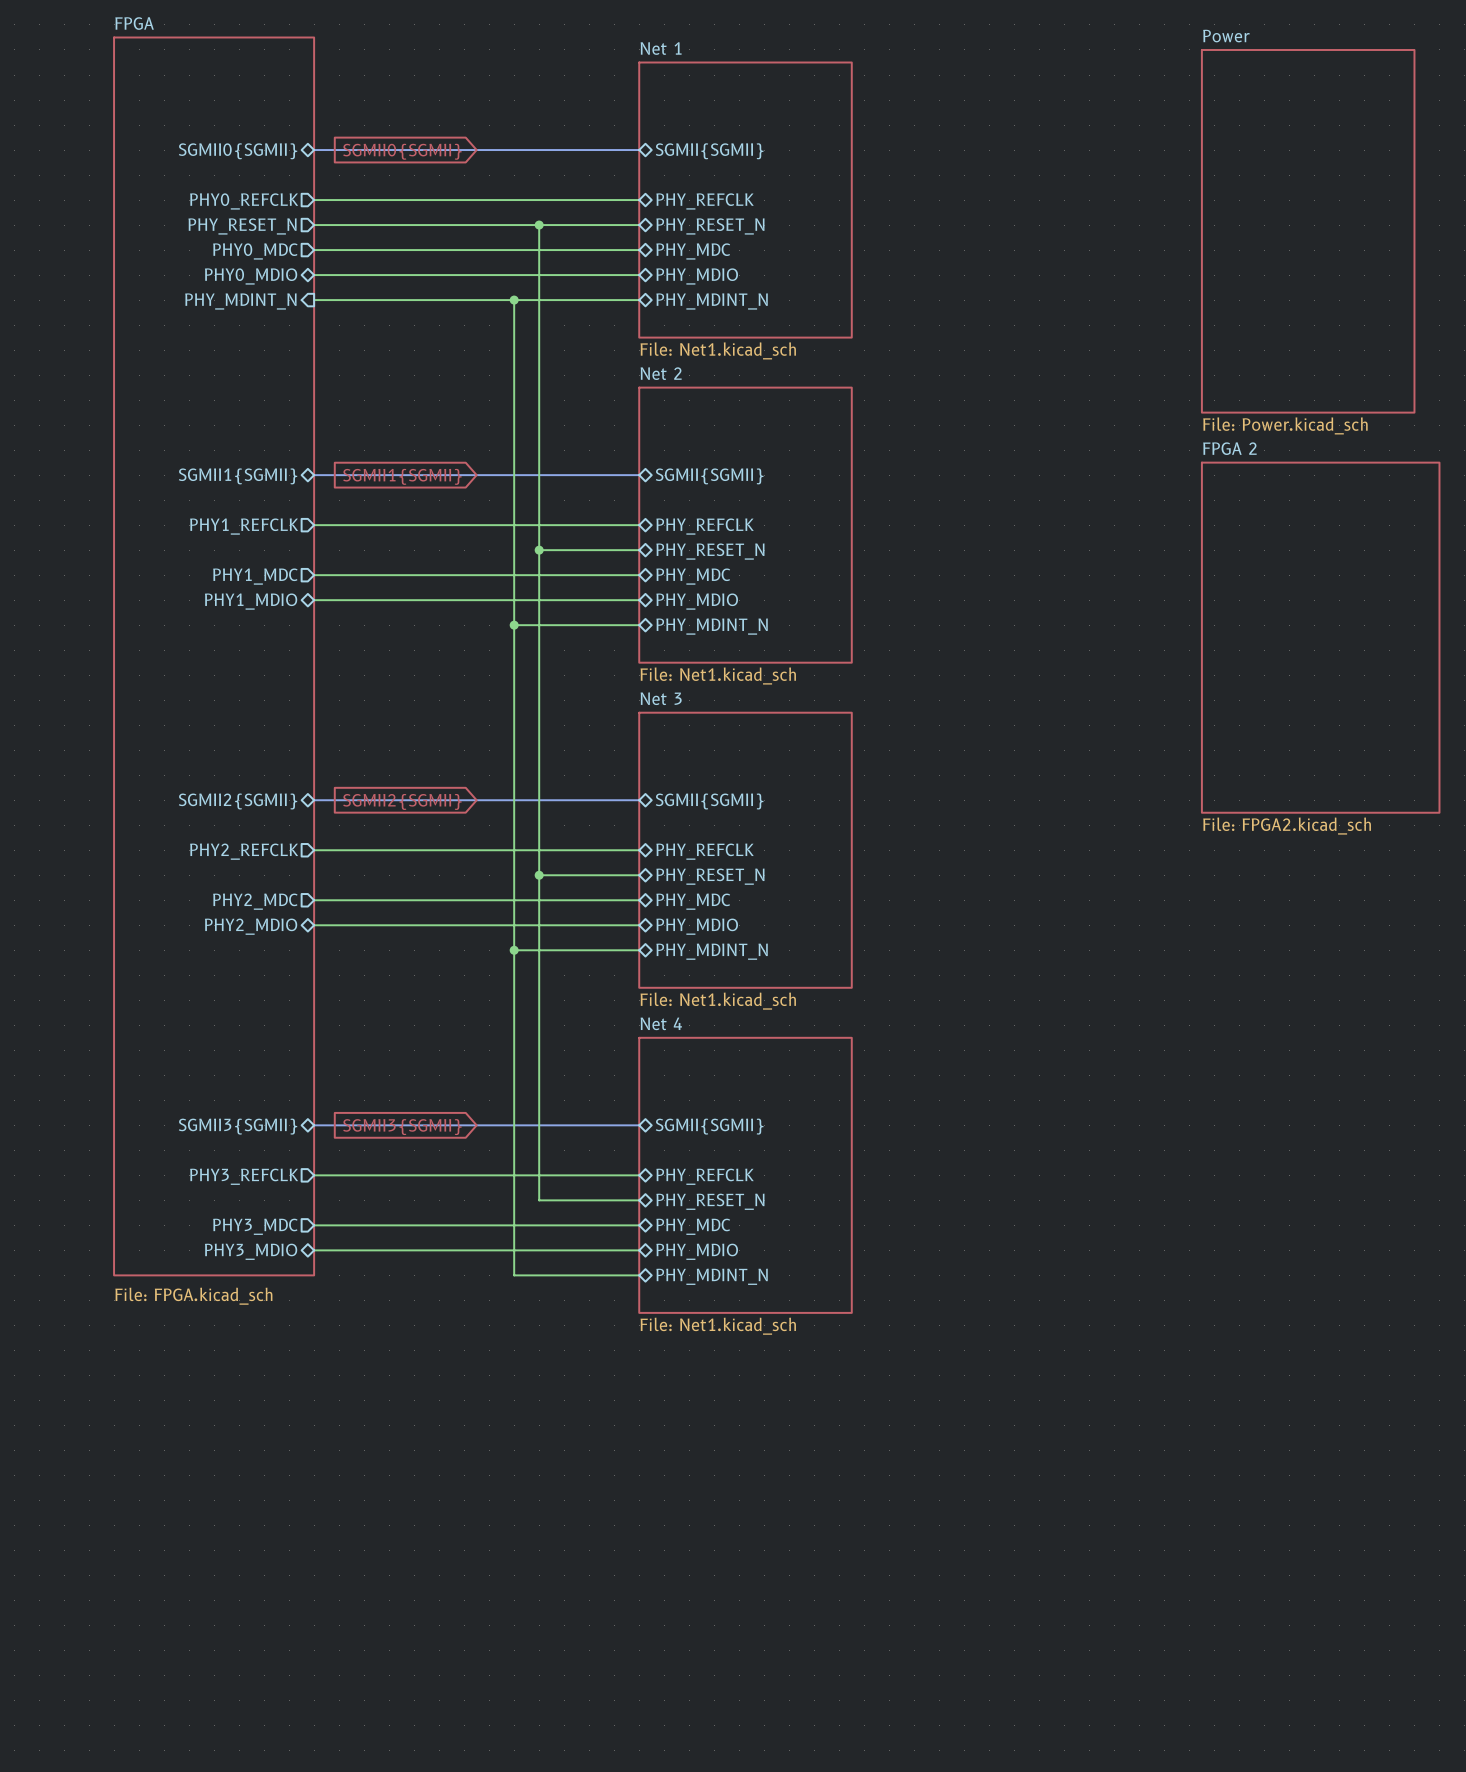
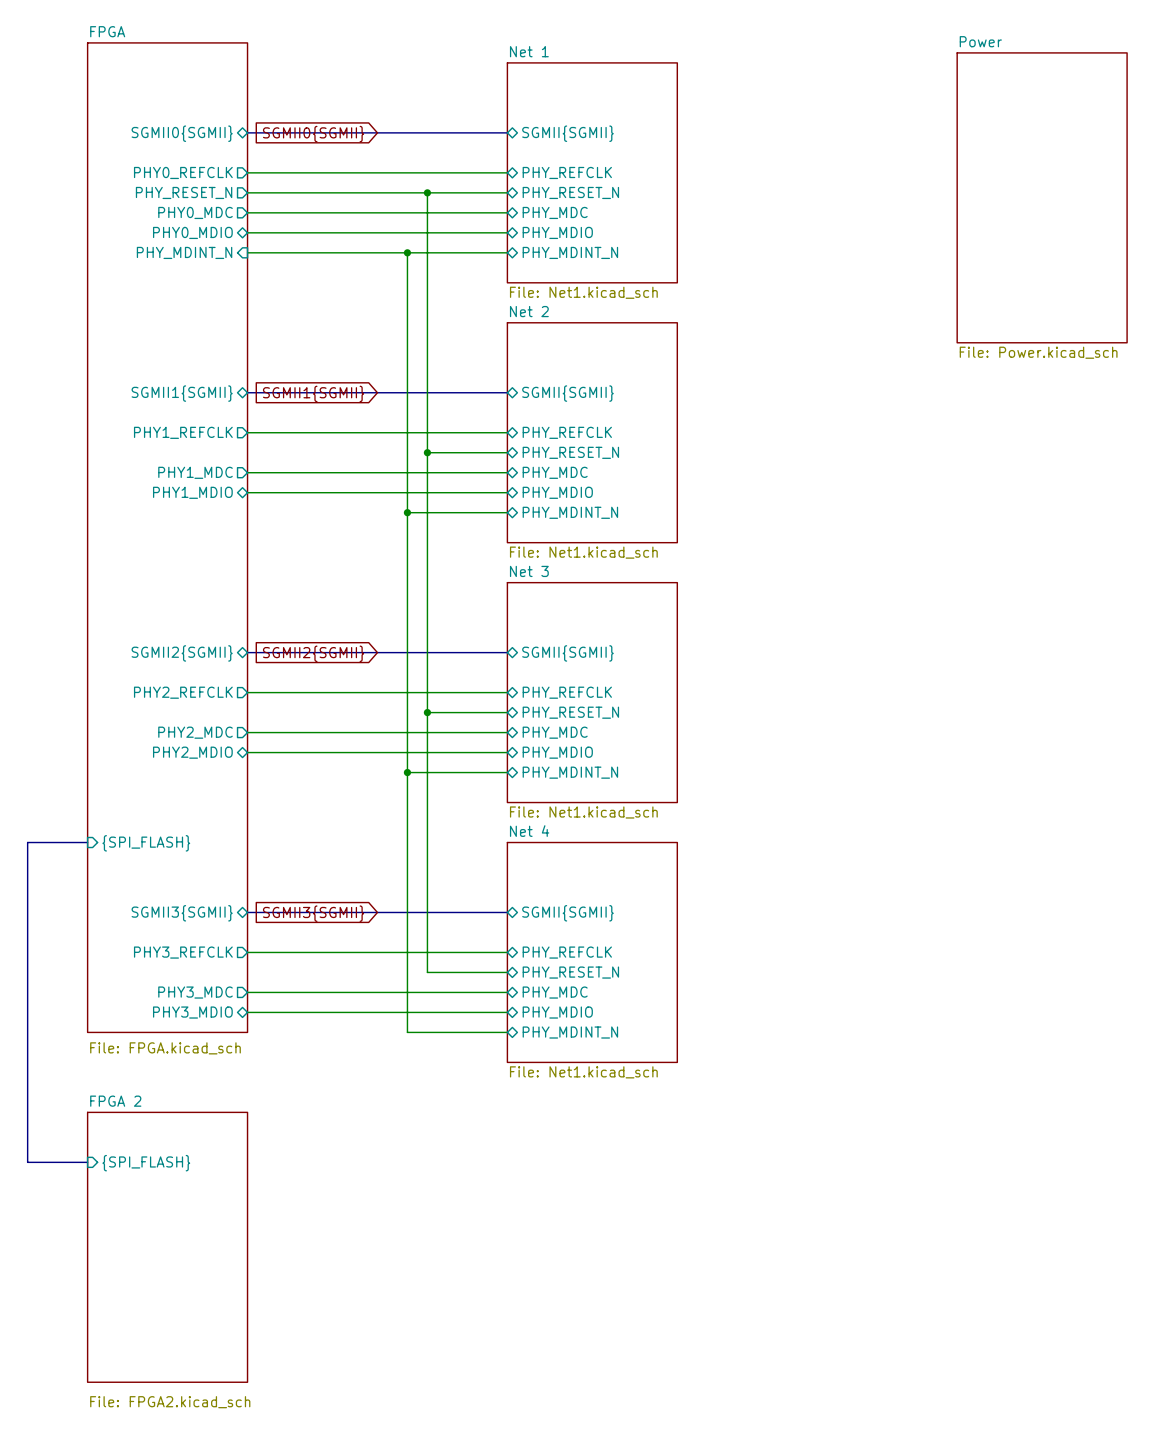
sheet FPGA 2 name position: FPGA 2 (1229, 448) -> FPGA 2 (115, 1101)
sheet FPGA 2 shape: [1201, 461, 1441, 814] -> [87, 1111, 249, 1383]
sheet FPGA 2 value position: File: FPGA2.kicad_sch (1287, 826) -> File: FPGA2.kicad_sch (170, 1402)
bus: none -> (87, 842) (27, 842) (27, 1162) (87, 1162)
sheet pin: none -> {SPI_FLASH} (146, 843)
sheet pin: none -> {SPI_FLASH} (146, 1163)

